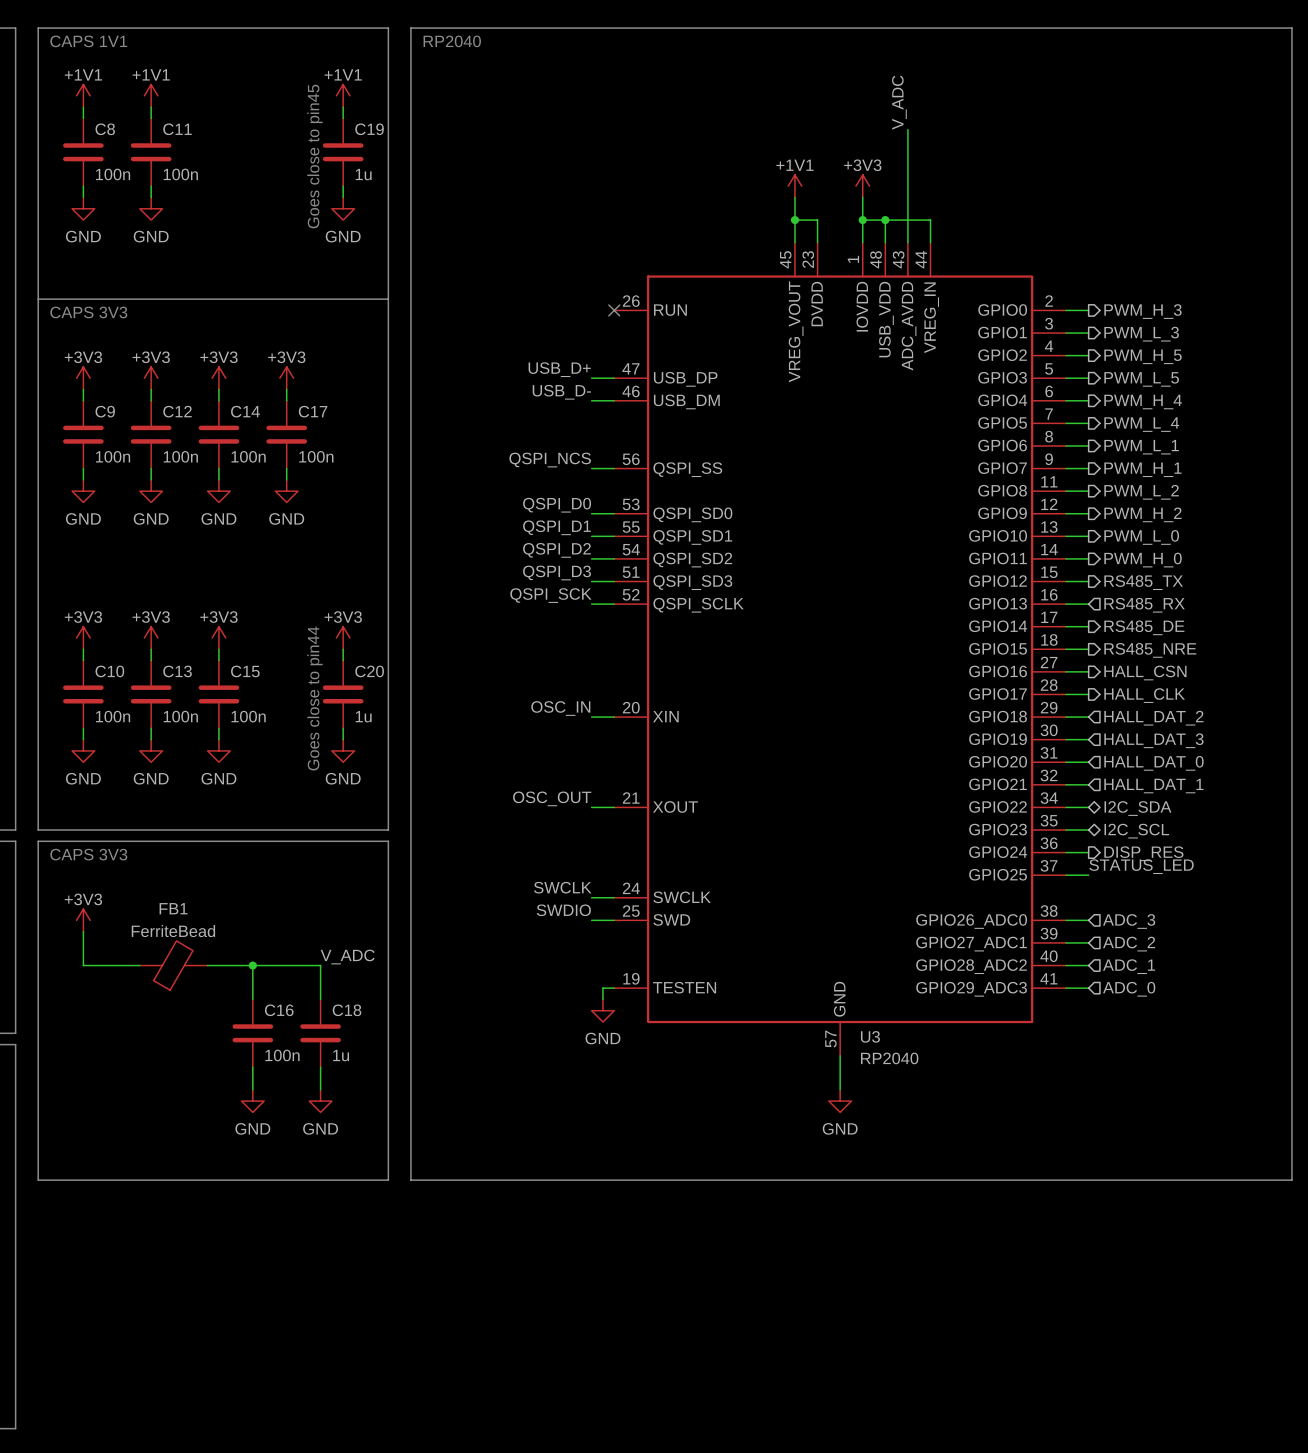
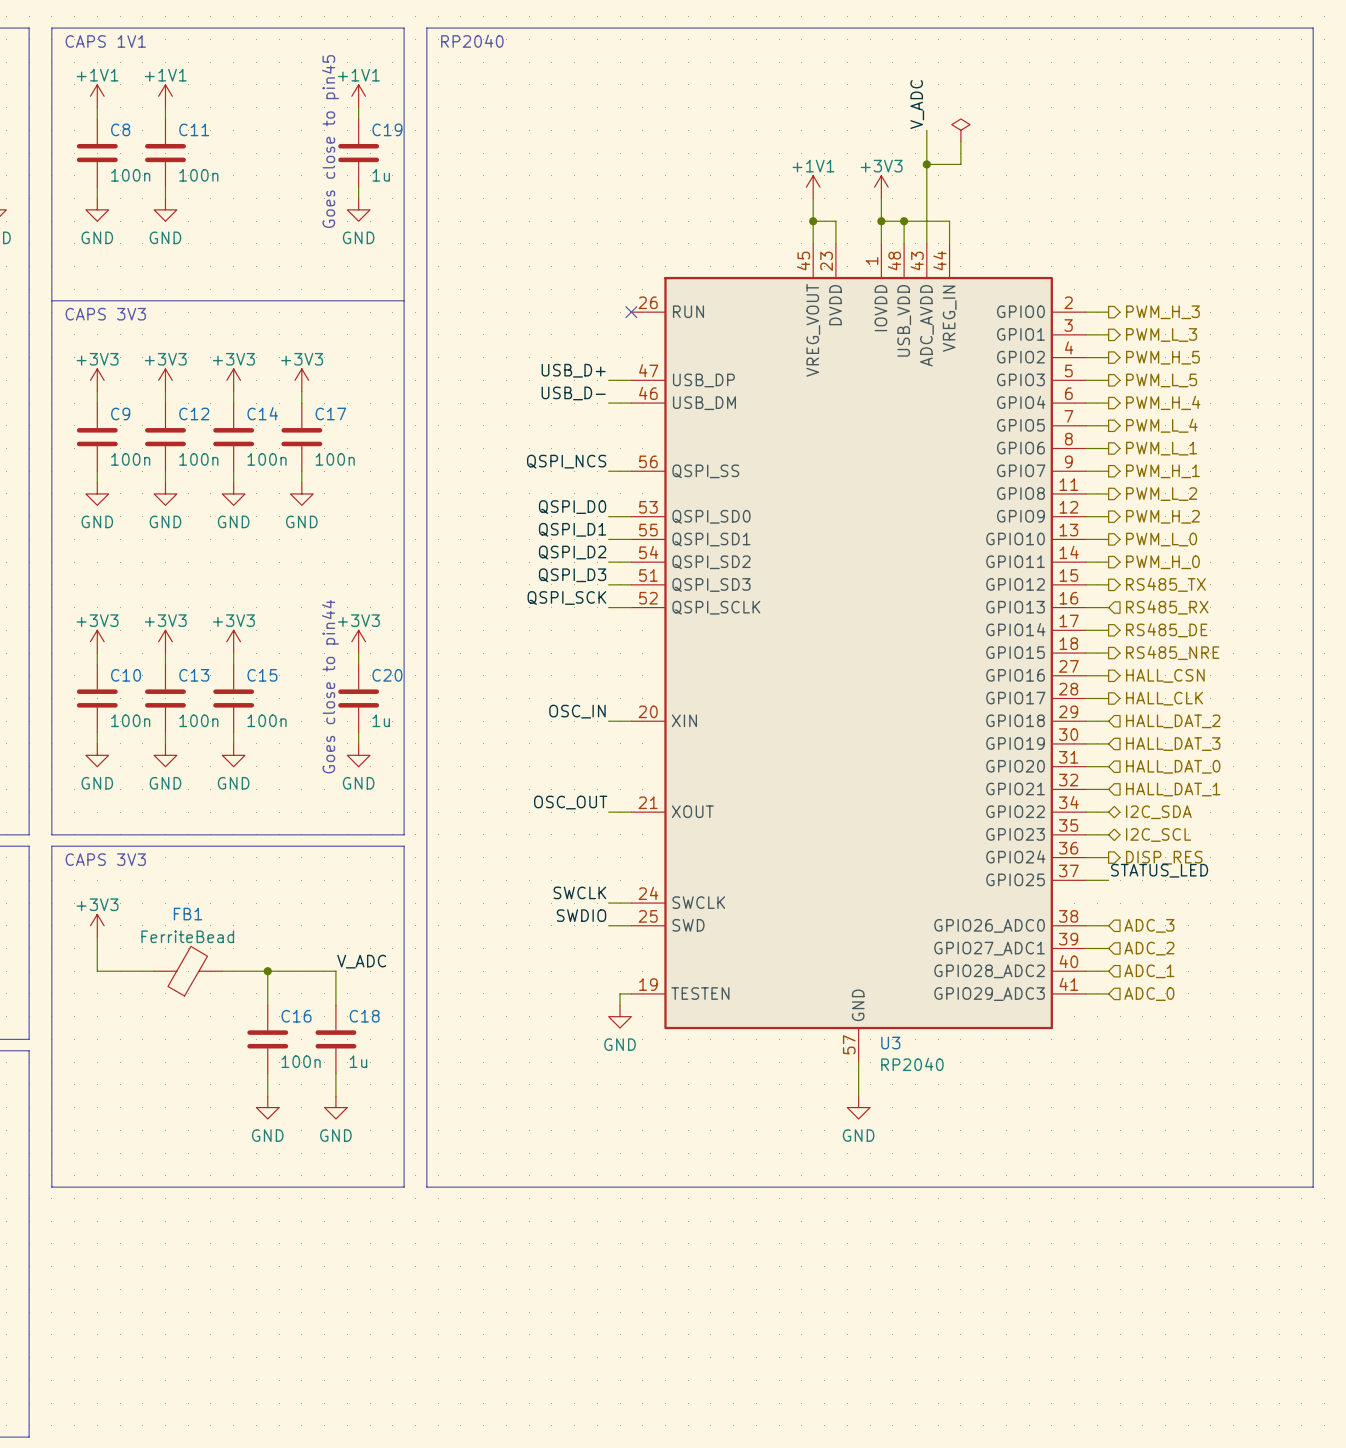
power symbol: none -> (960, 130)
wire: none -> (960, 141) (960, 164) (926, 164)
junction: none -> (926, 164)

